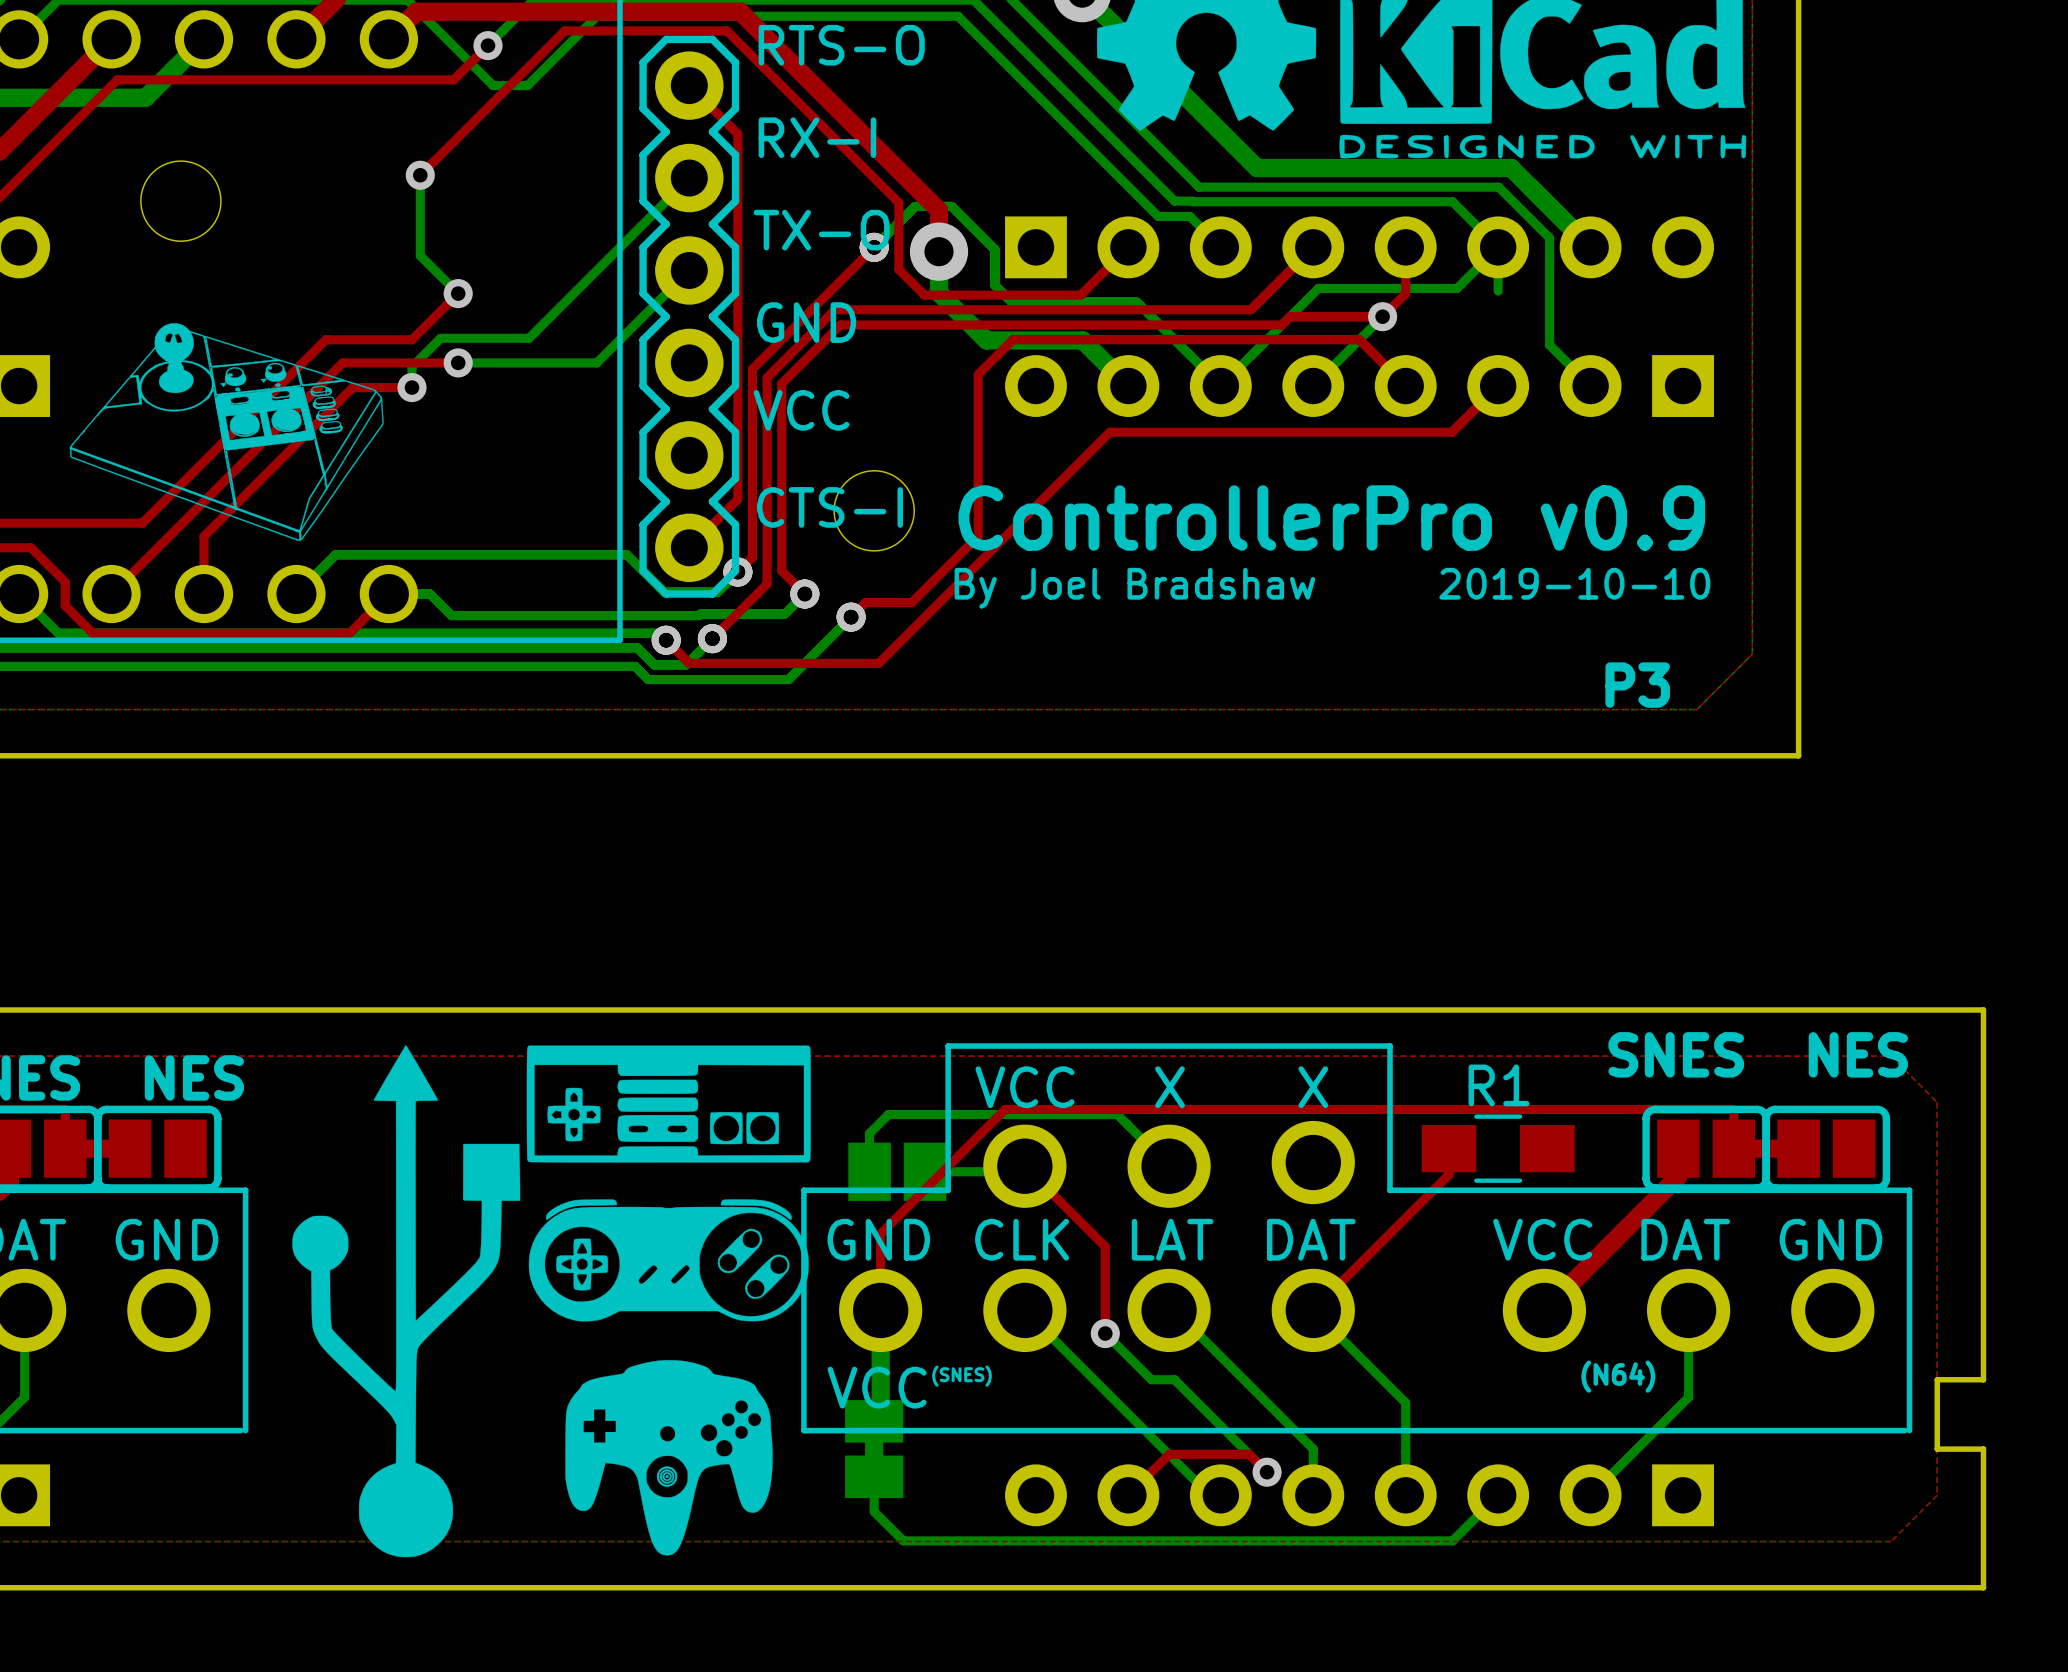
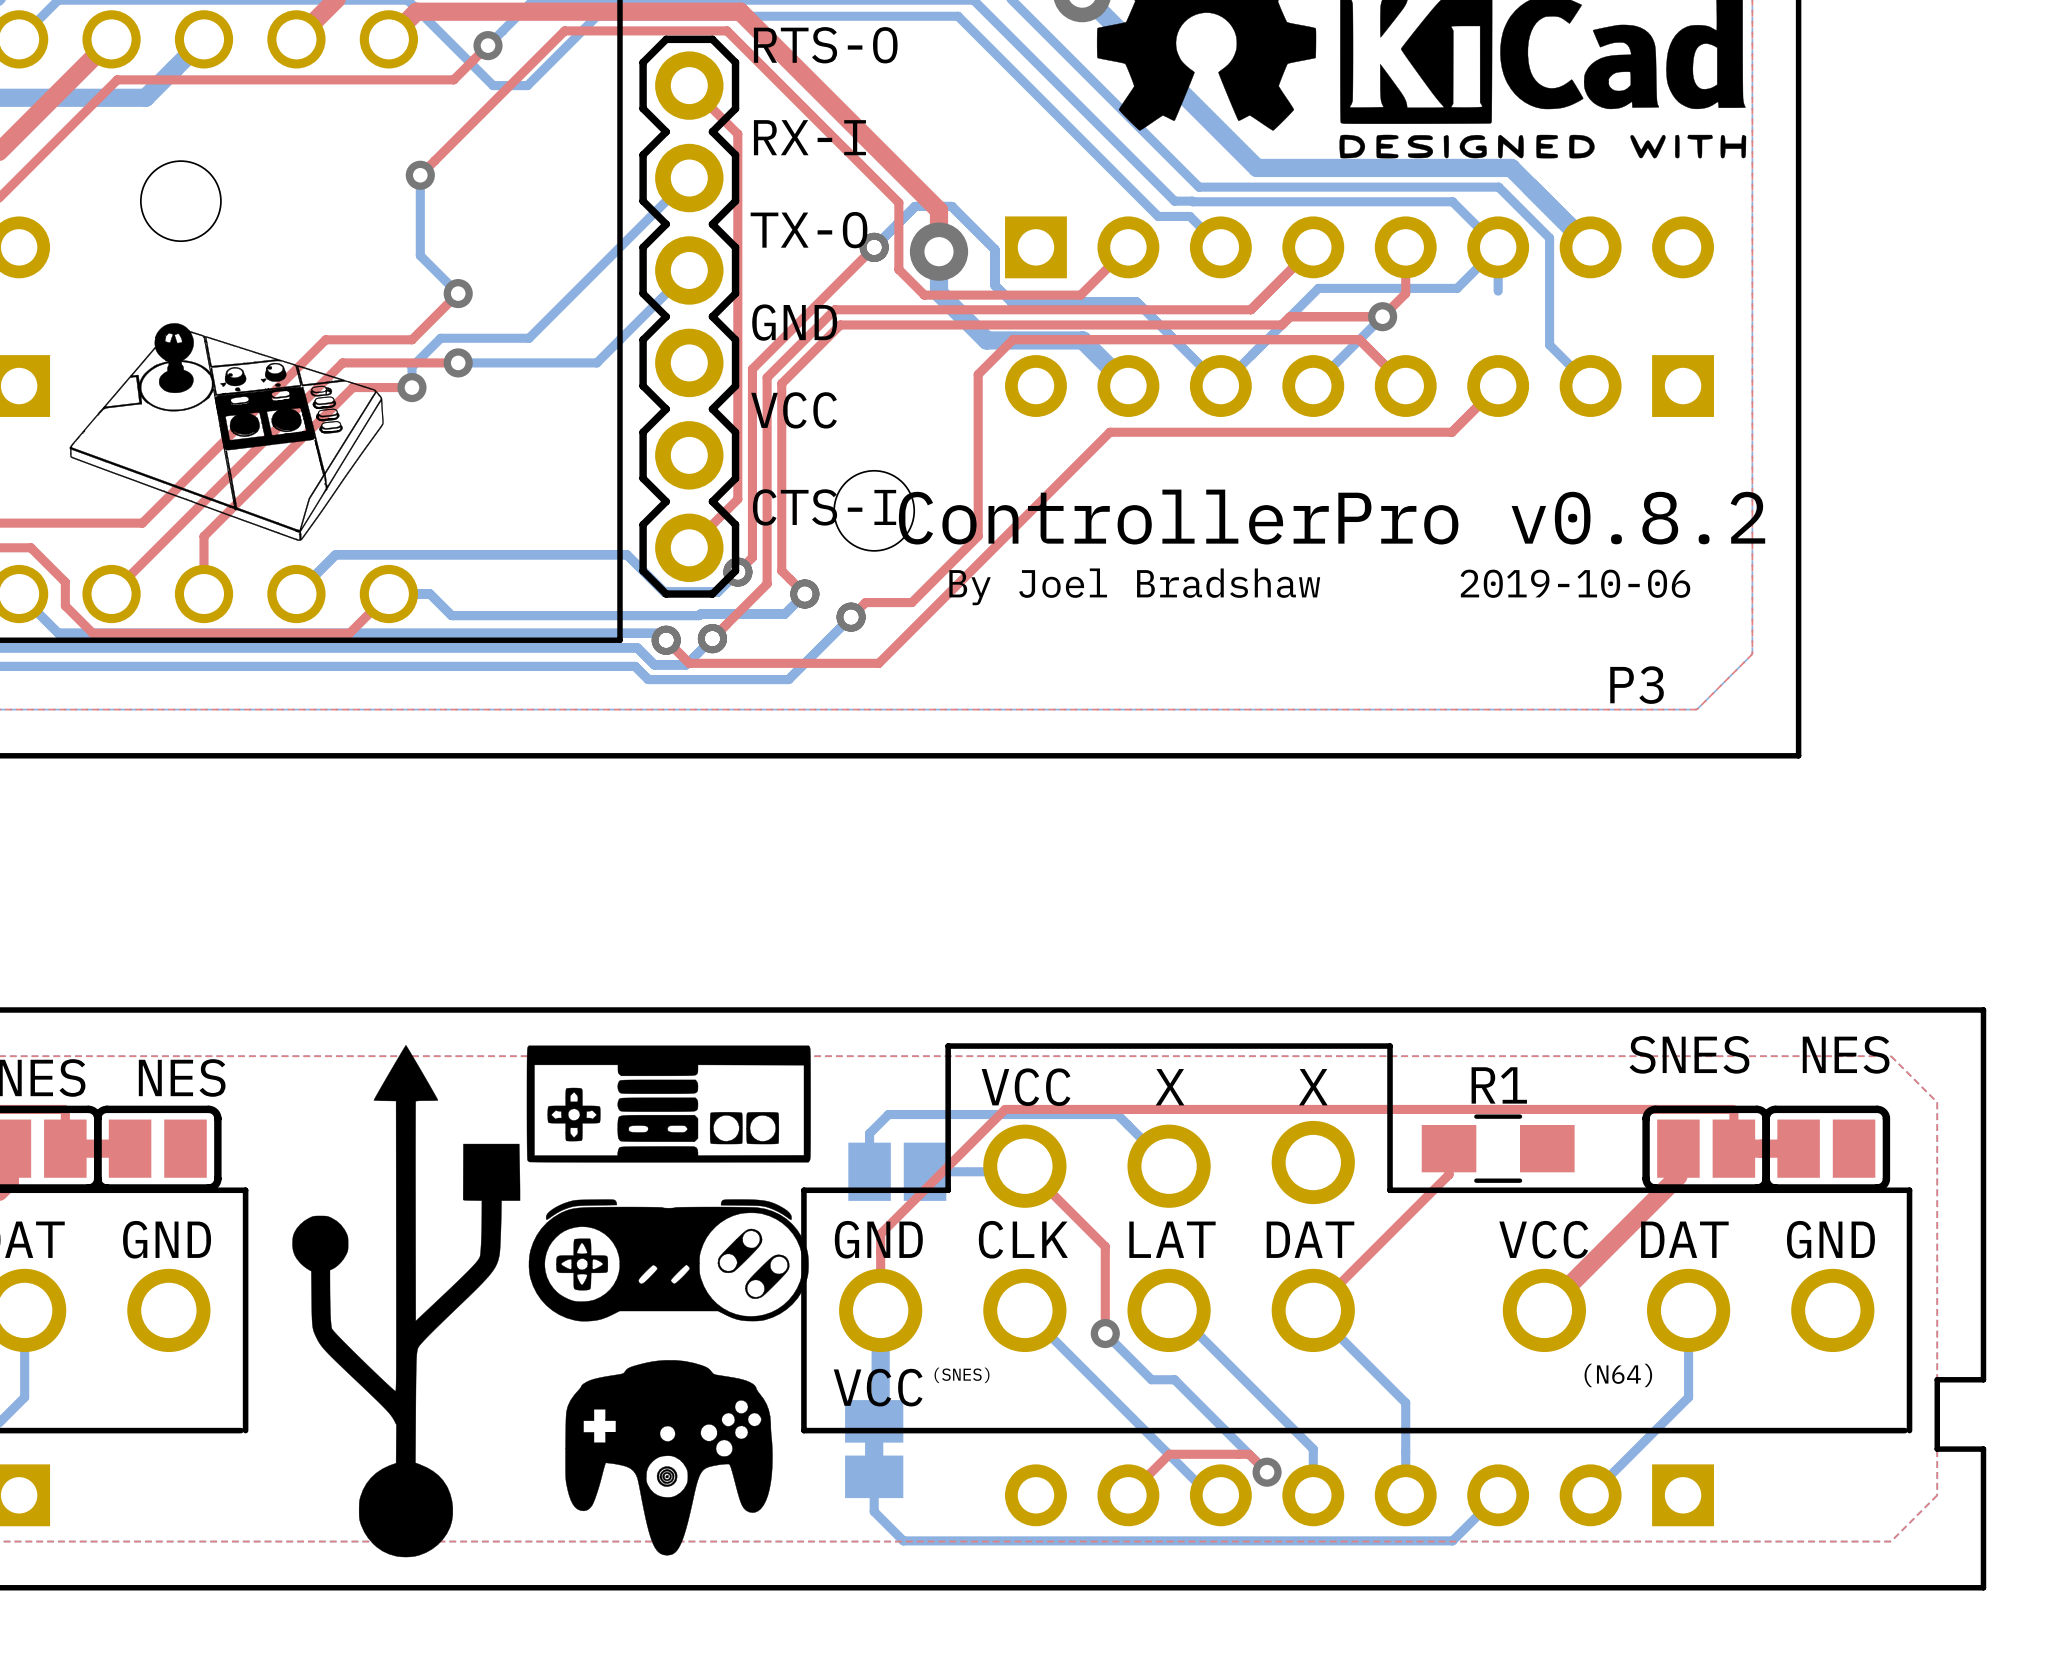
text: ControllerPro v0.9 (1331, 518) -> ControllerPro v0.8.2 (1332, 517)
text: 2019-10-10 (1574, 583) -> 2019-10-06 (1575, 583)

